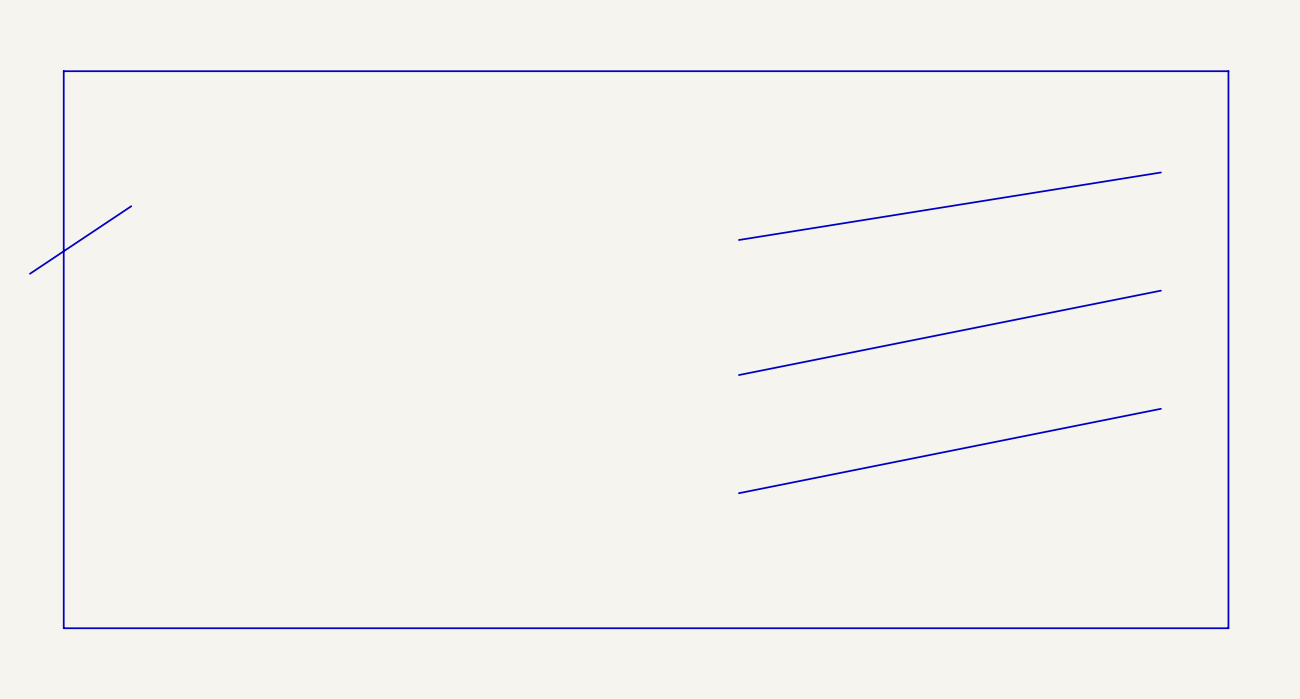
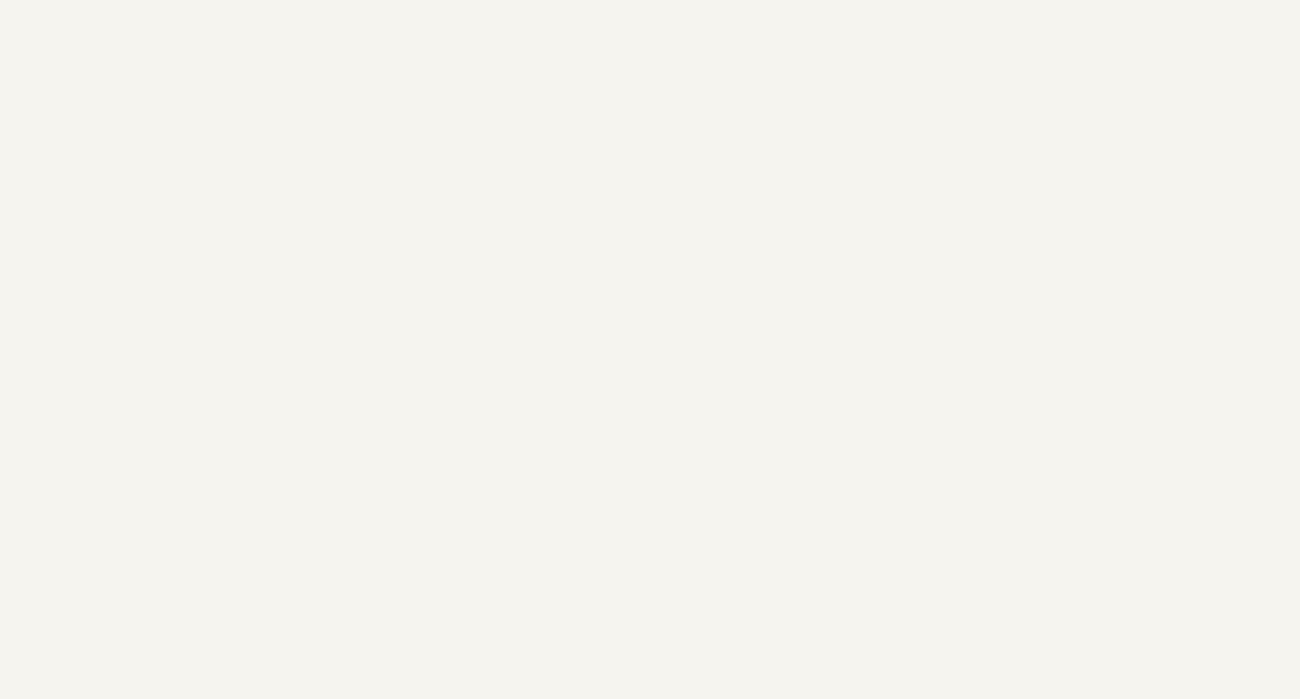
line: (63, 71) (1228, 71) (1228, 628) (63, 628) (63, 71) -> none
line: (1160, 172) (738, 240) -> none
line: (131, 206) (29, 273) -> none
line: (1160, 290) (738, 375) -> none
line: (1160, 408) (738, 493) -> none

